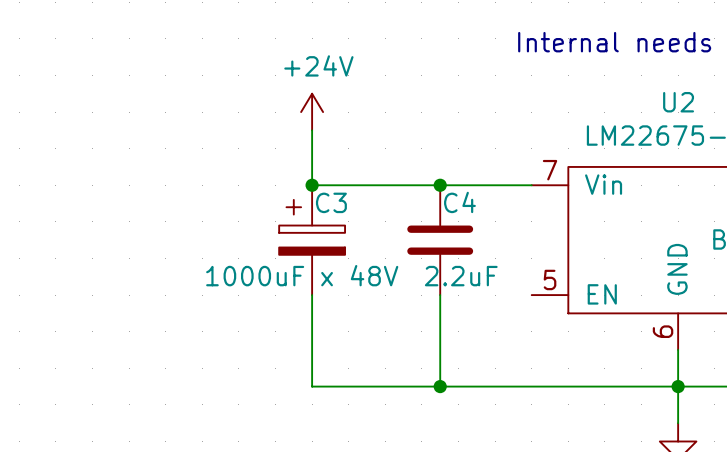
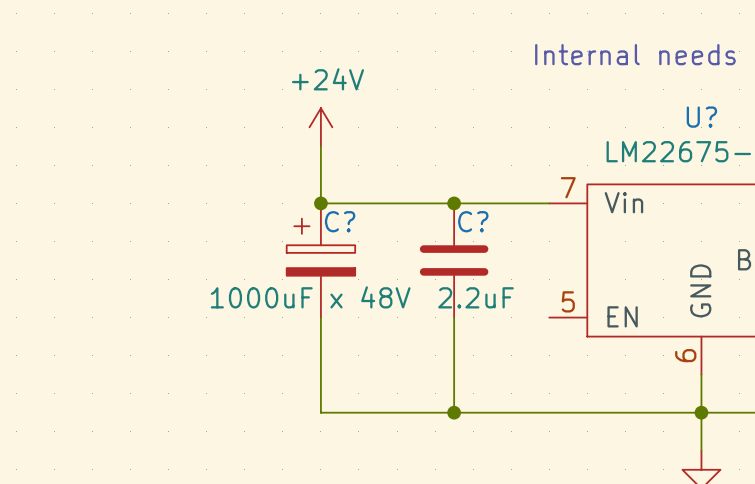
U2 name: U2 (678, 102) -> U? (701, 117)
C3 name: C3 (331, 202) -> C? (340, 221)
C4 name: C4 (459, 202) -> C? (473, 221)

